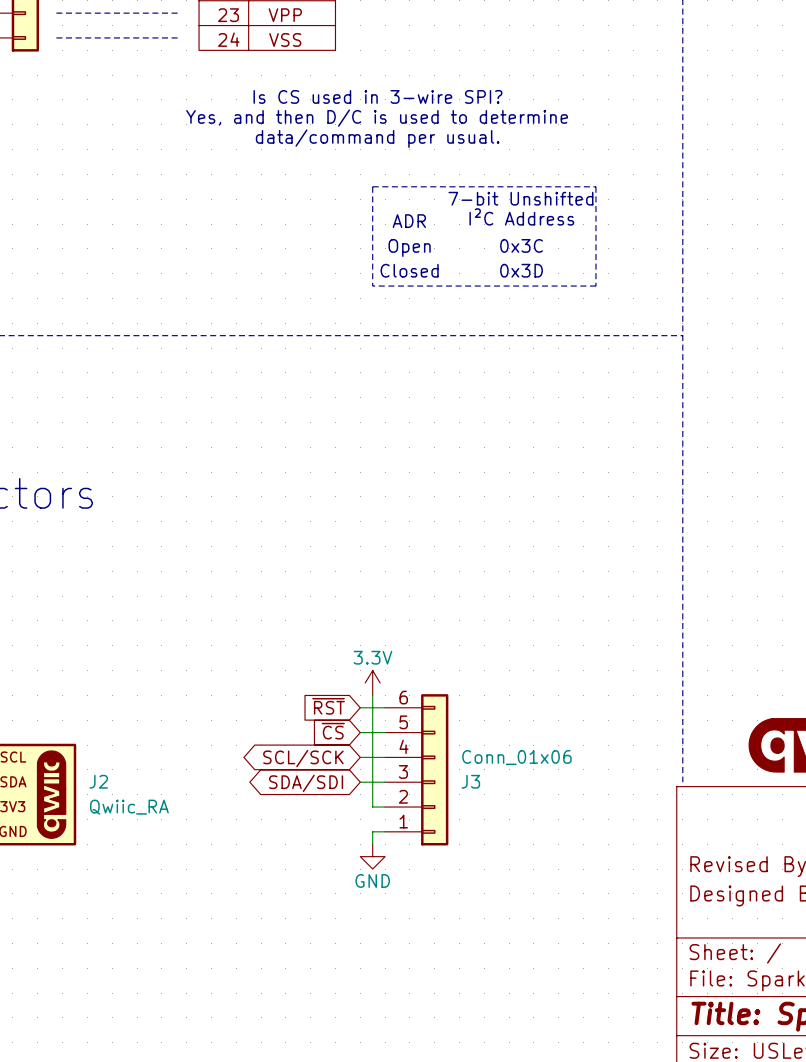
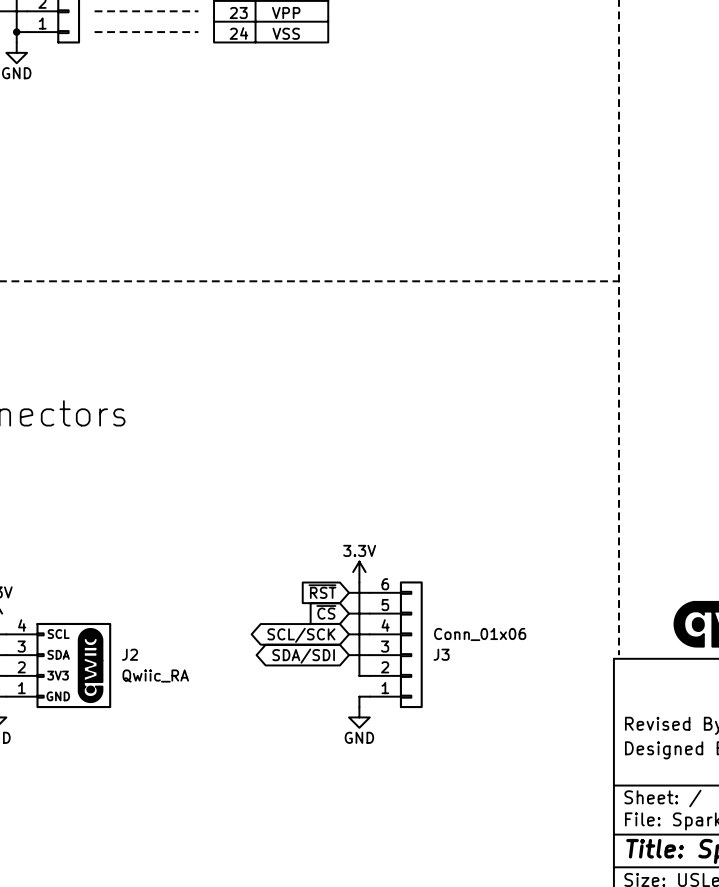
text: Is CS used in 3-wire SPI? (377, 96) -> none
text: Yes, and then D/C is used to determine (377, 118) -> none
text: data/command per usual. (377, 138) -> none
line: (372, 186) (372, 286) (595, 286) (595, 186) (372, 186) -> none
text: 7-bit Unshifted (520, 198) -> none
text: I²C Address (521, 216) -> none
text: ADR (409, 221) -> none
text: 0x3C (521, 245) -> none
text: Open (409, 247) -> none
text: Closed (409, 270) -> none
text: 0x3D (521, 270) -> none

